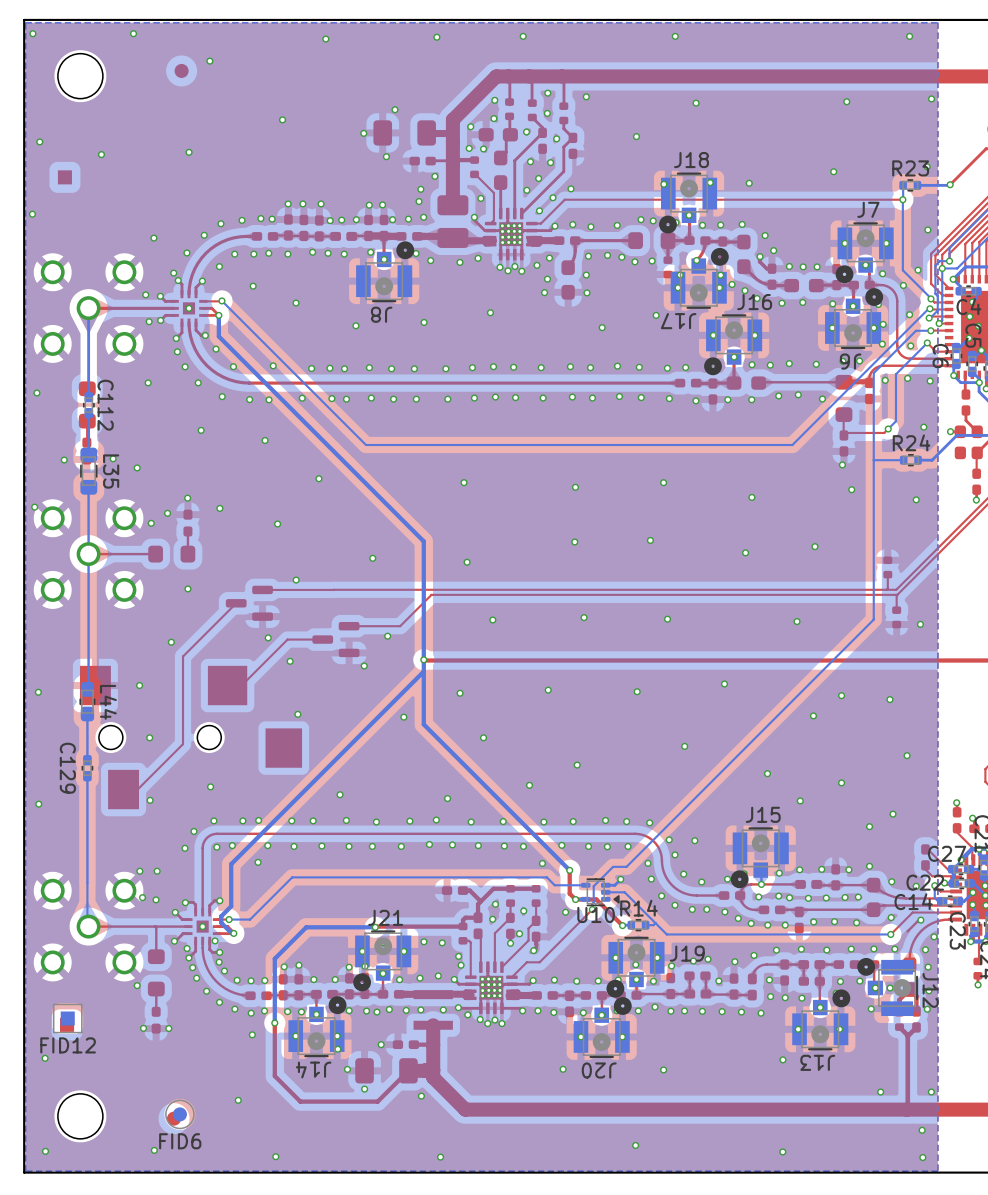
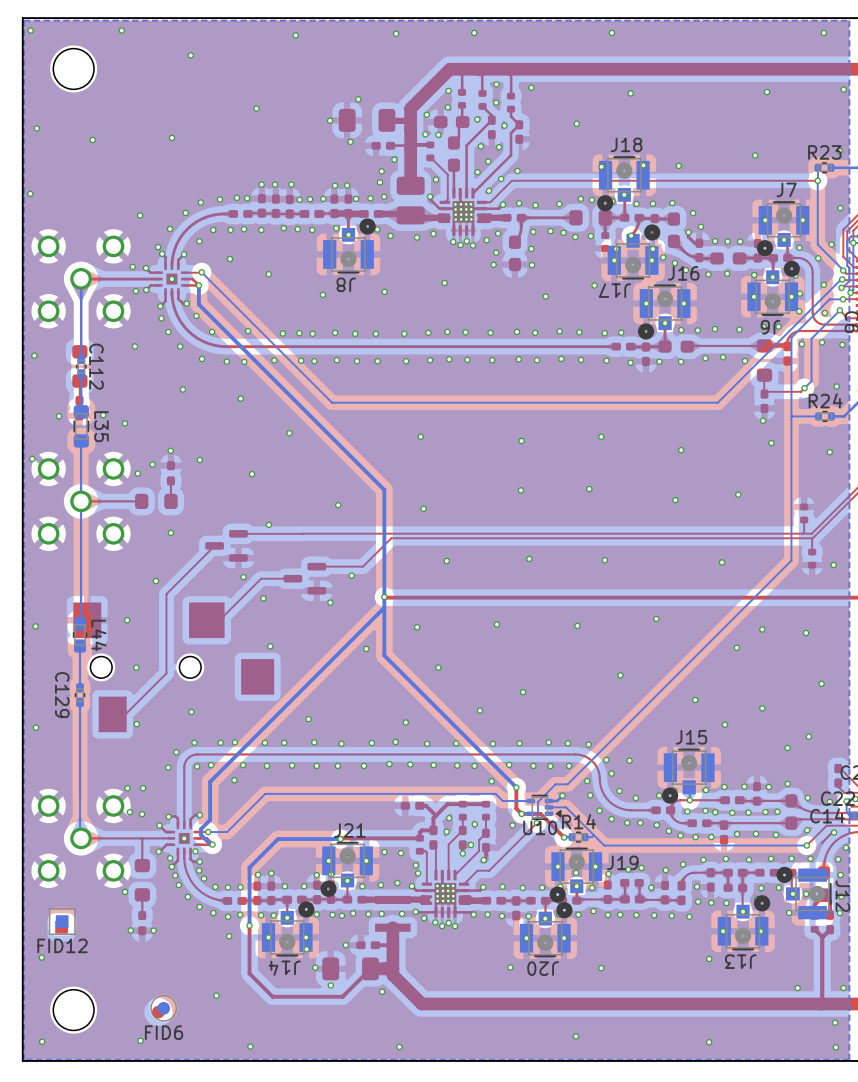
part: (181, 70) -> none
part: (64, 177) -> none

